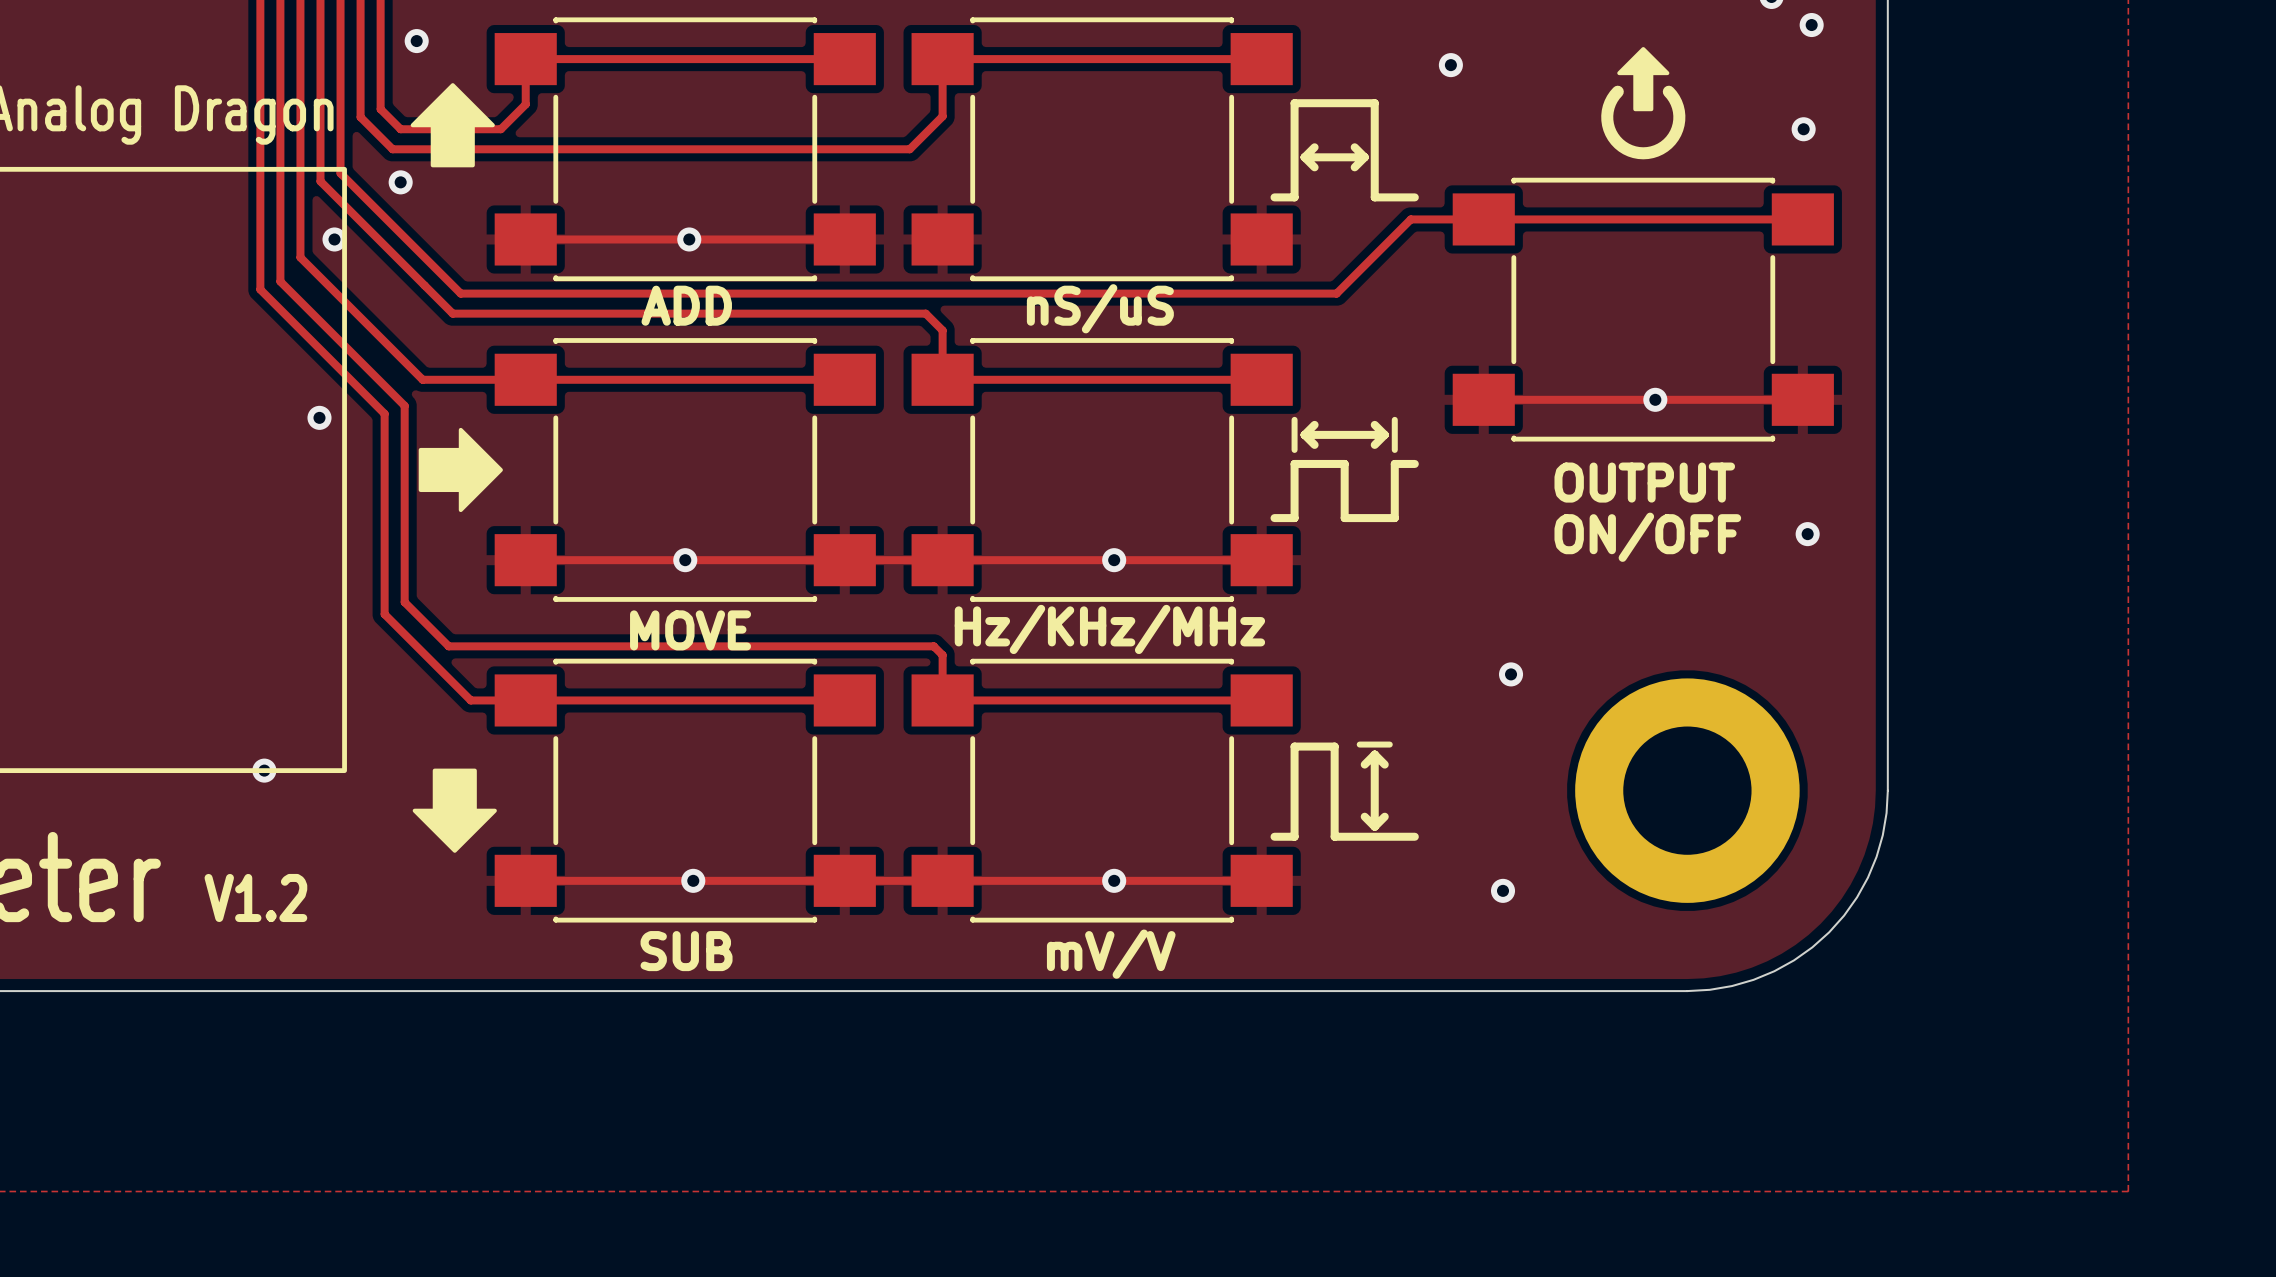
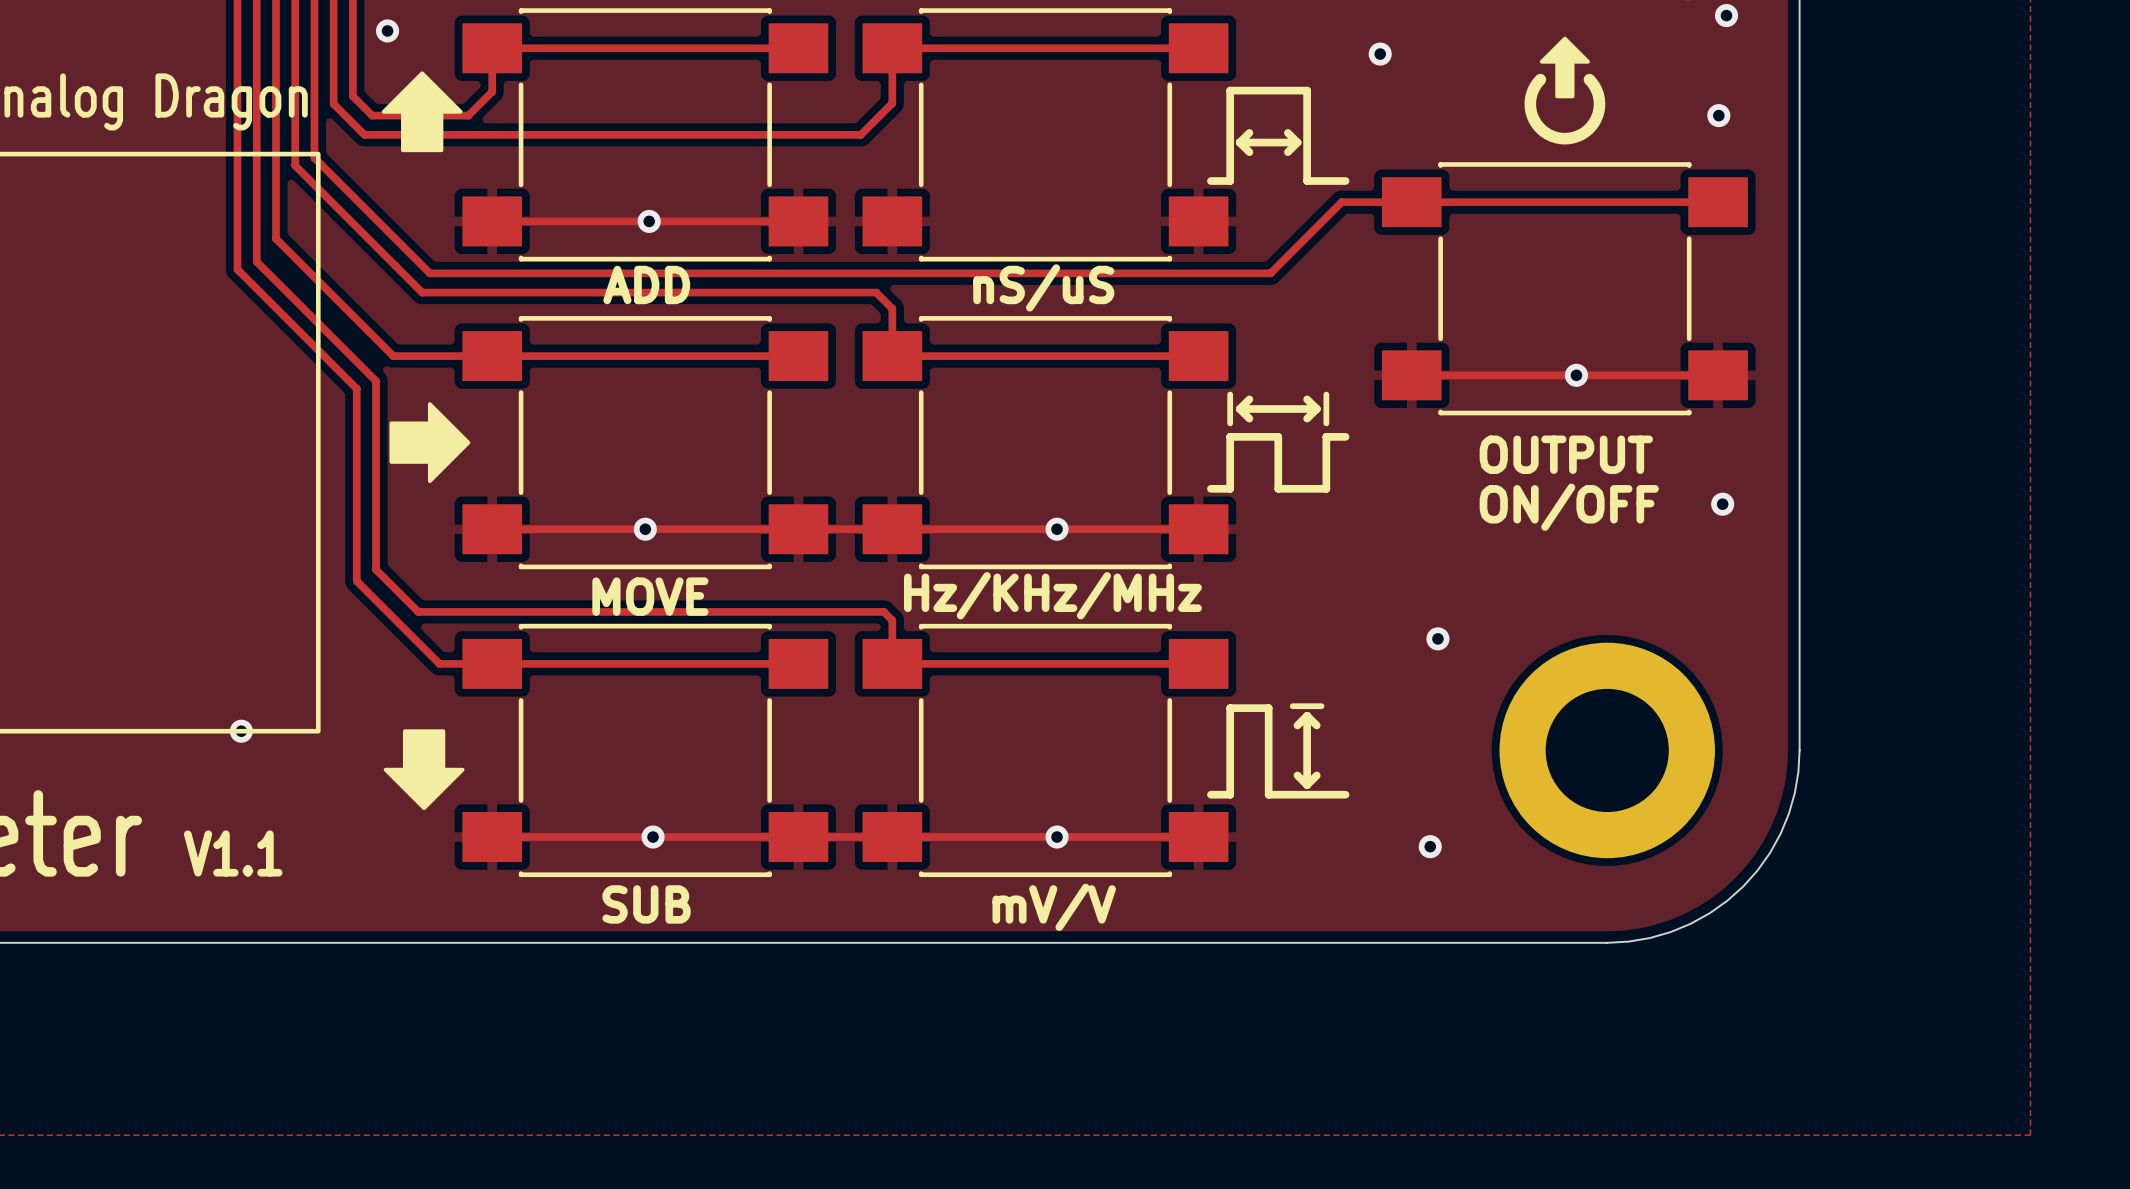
via: (400, 182) -> none
via: (334, 239) -> none
via: (319, 417) -> none
text: V1.2 (255, 897) -> V1.1 (233, 853)

